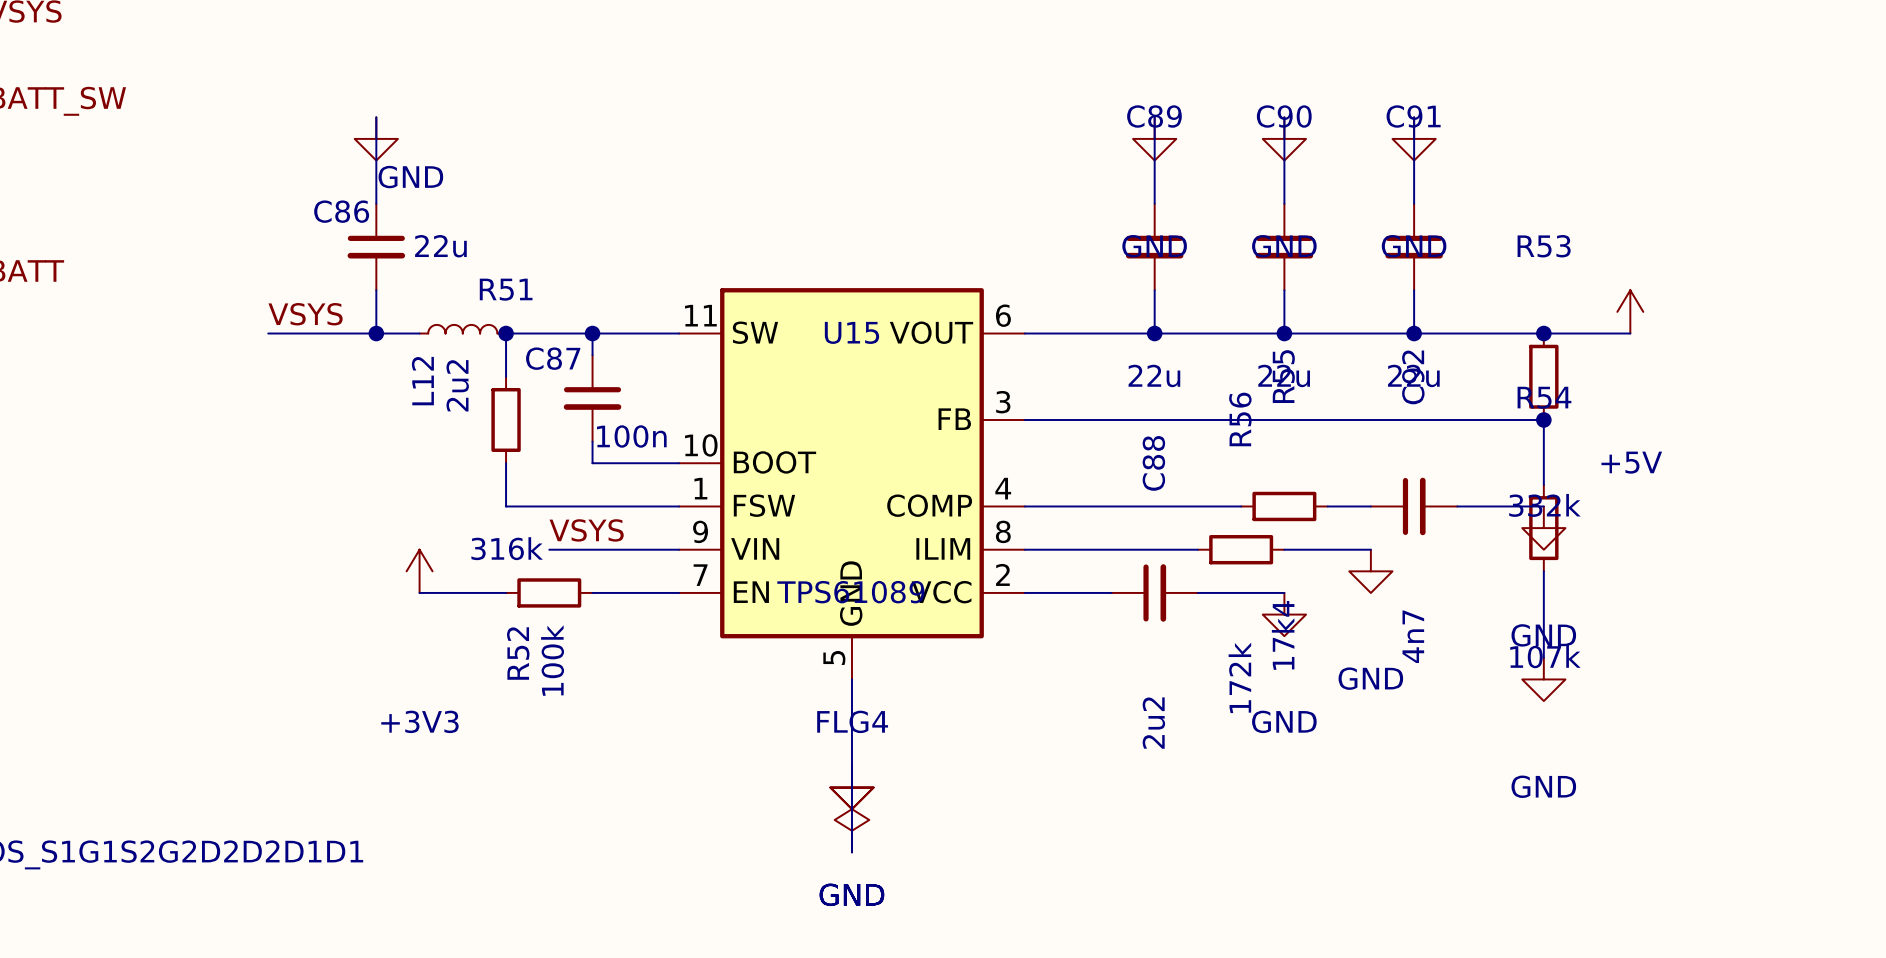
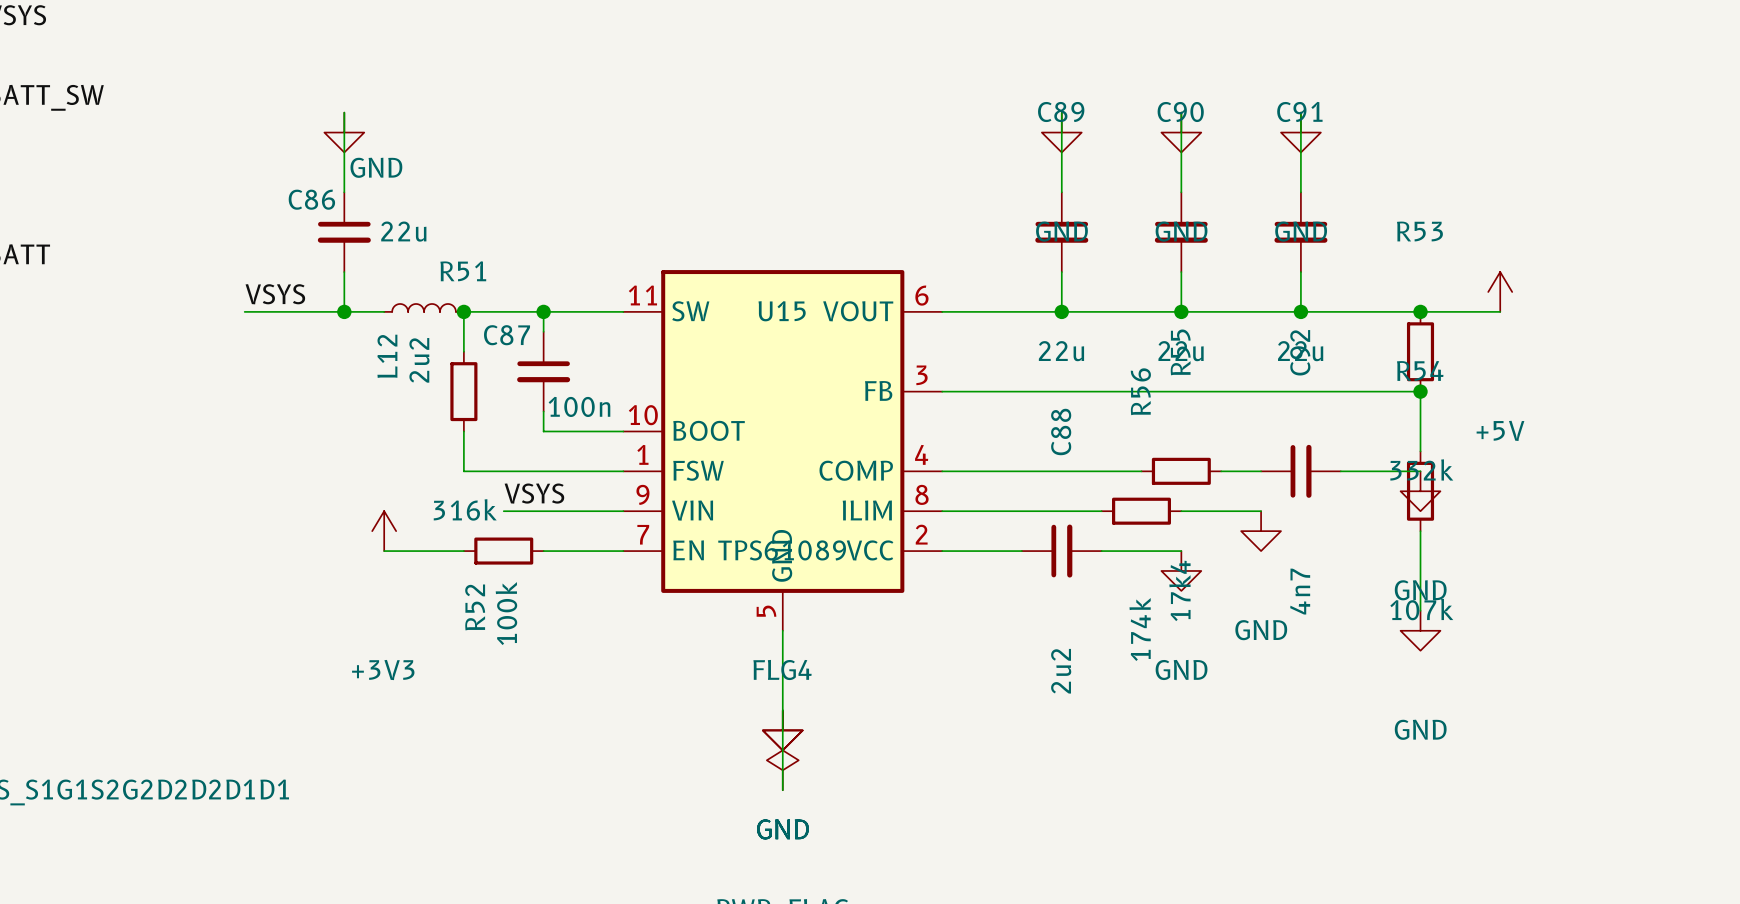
R56 value: 172k (1239, 677) -> 174k (1140, 629)

